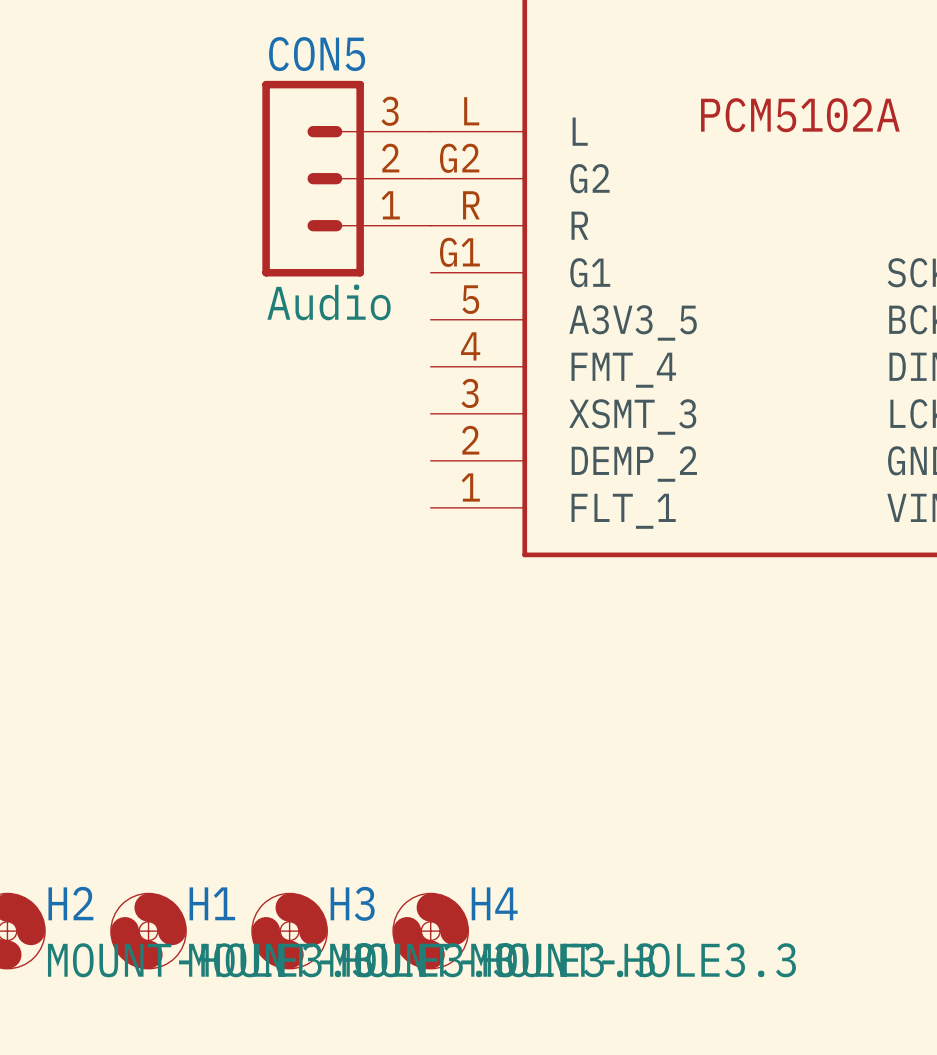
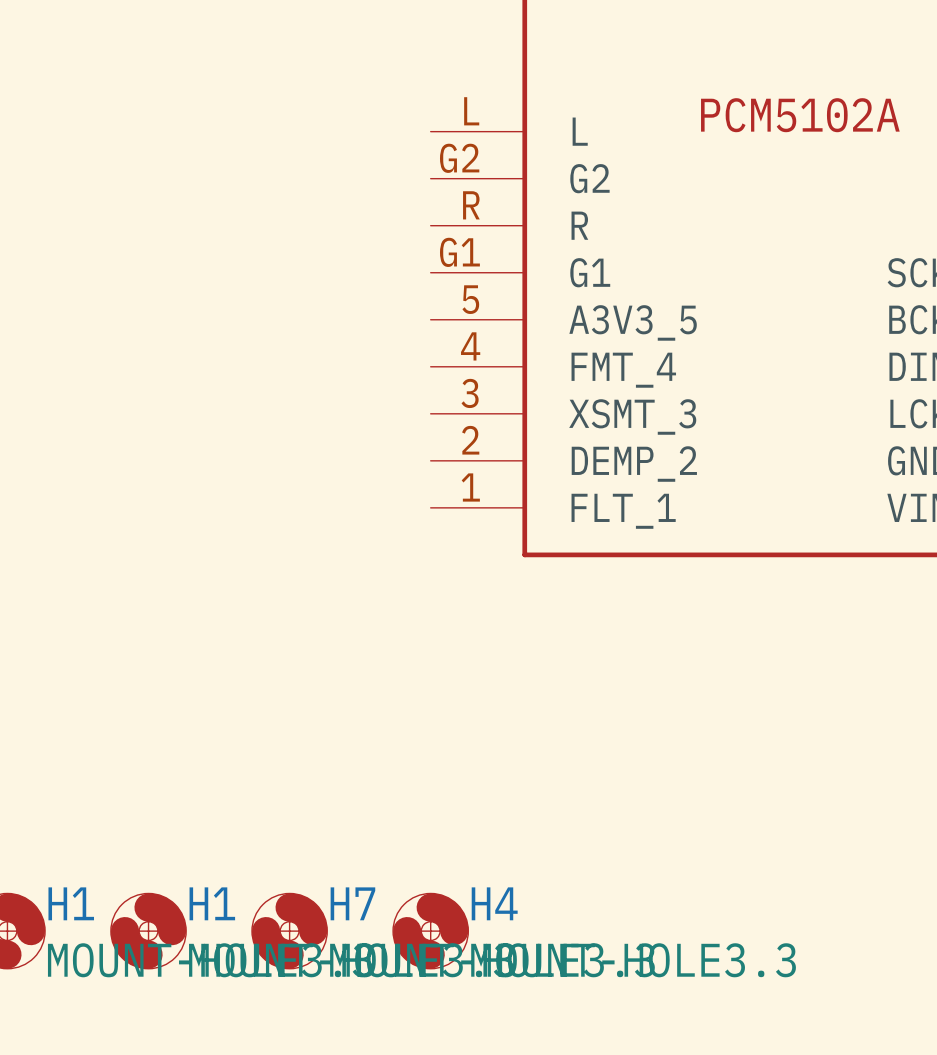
CON5: Audio (346, 178) -> none
H2 name: H2 (70, 903) -> H1 (71, 903)
H3 name: H3 (352, 903) -> H7 (352, 903)

